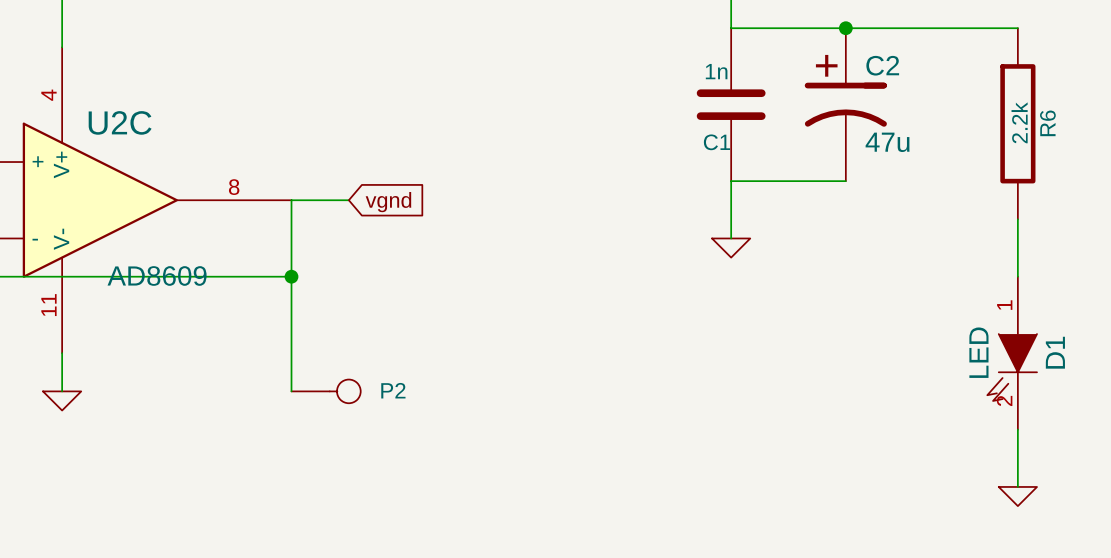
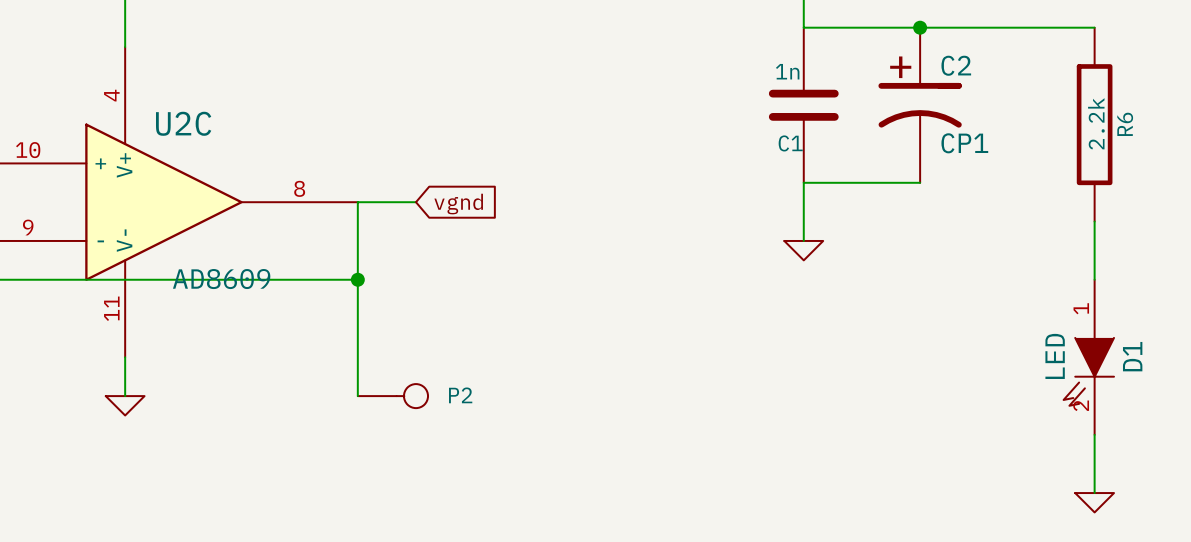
C2 value: 47u (887, 142) -> CP1 (964, 143)

